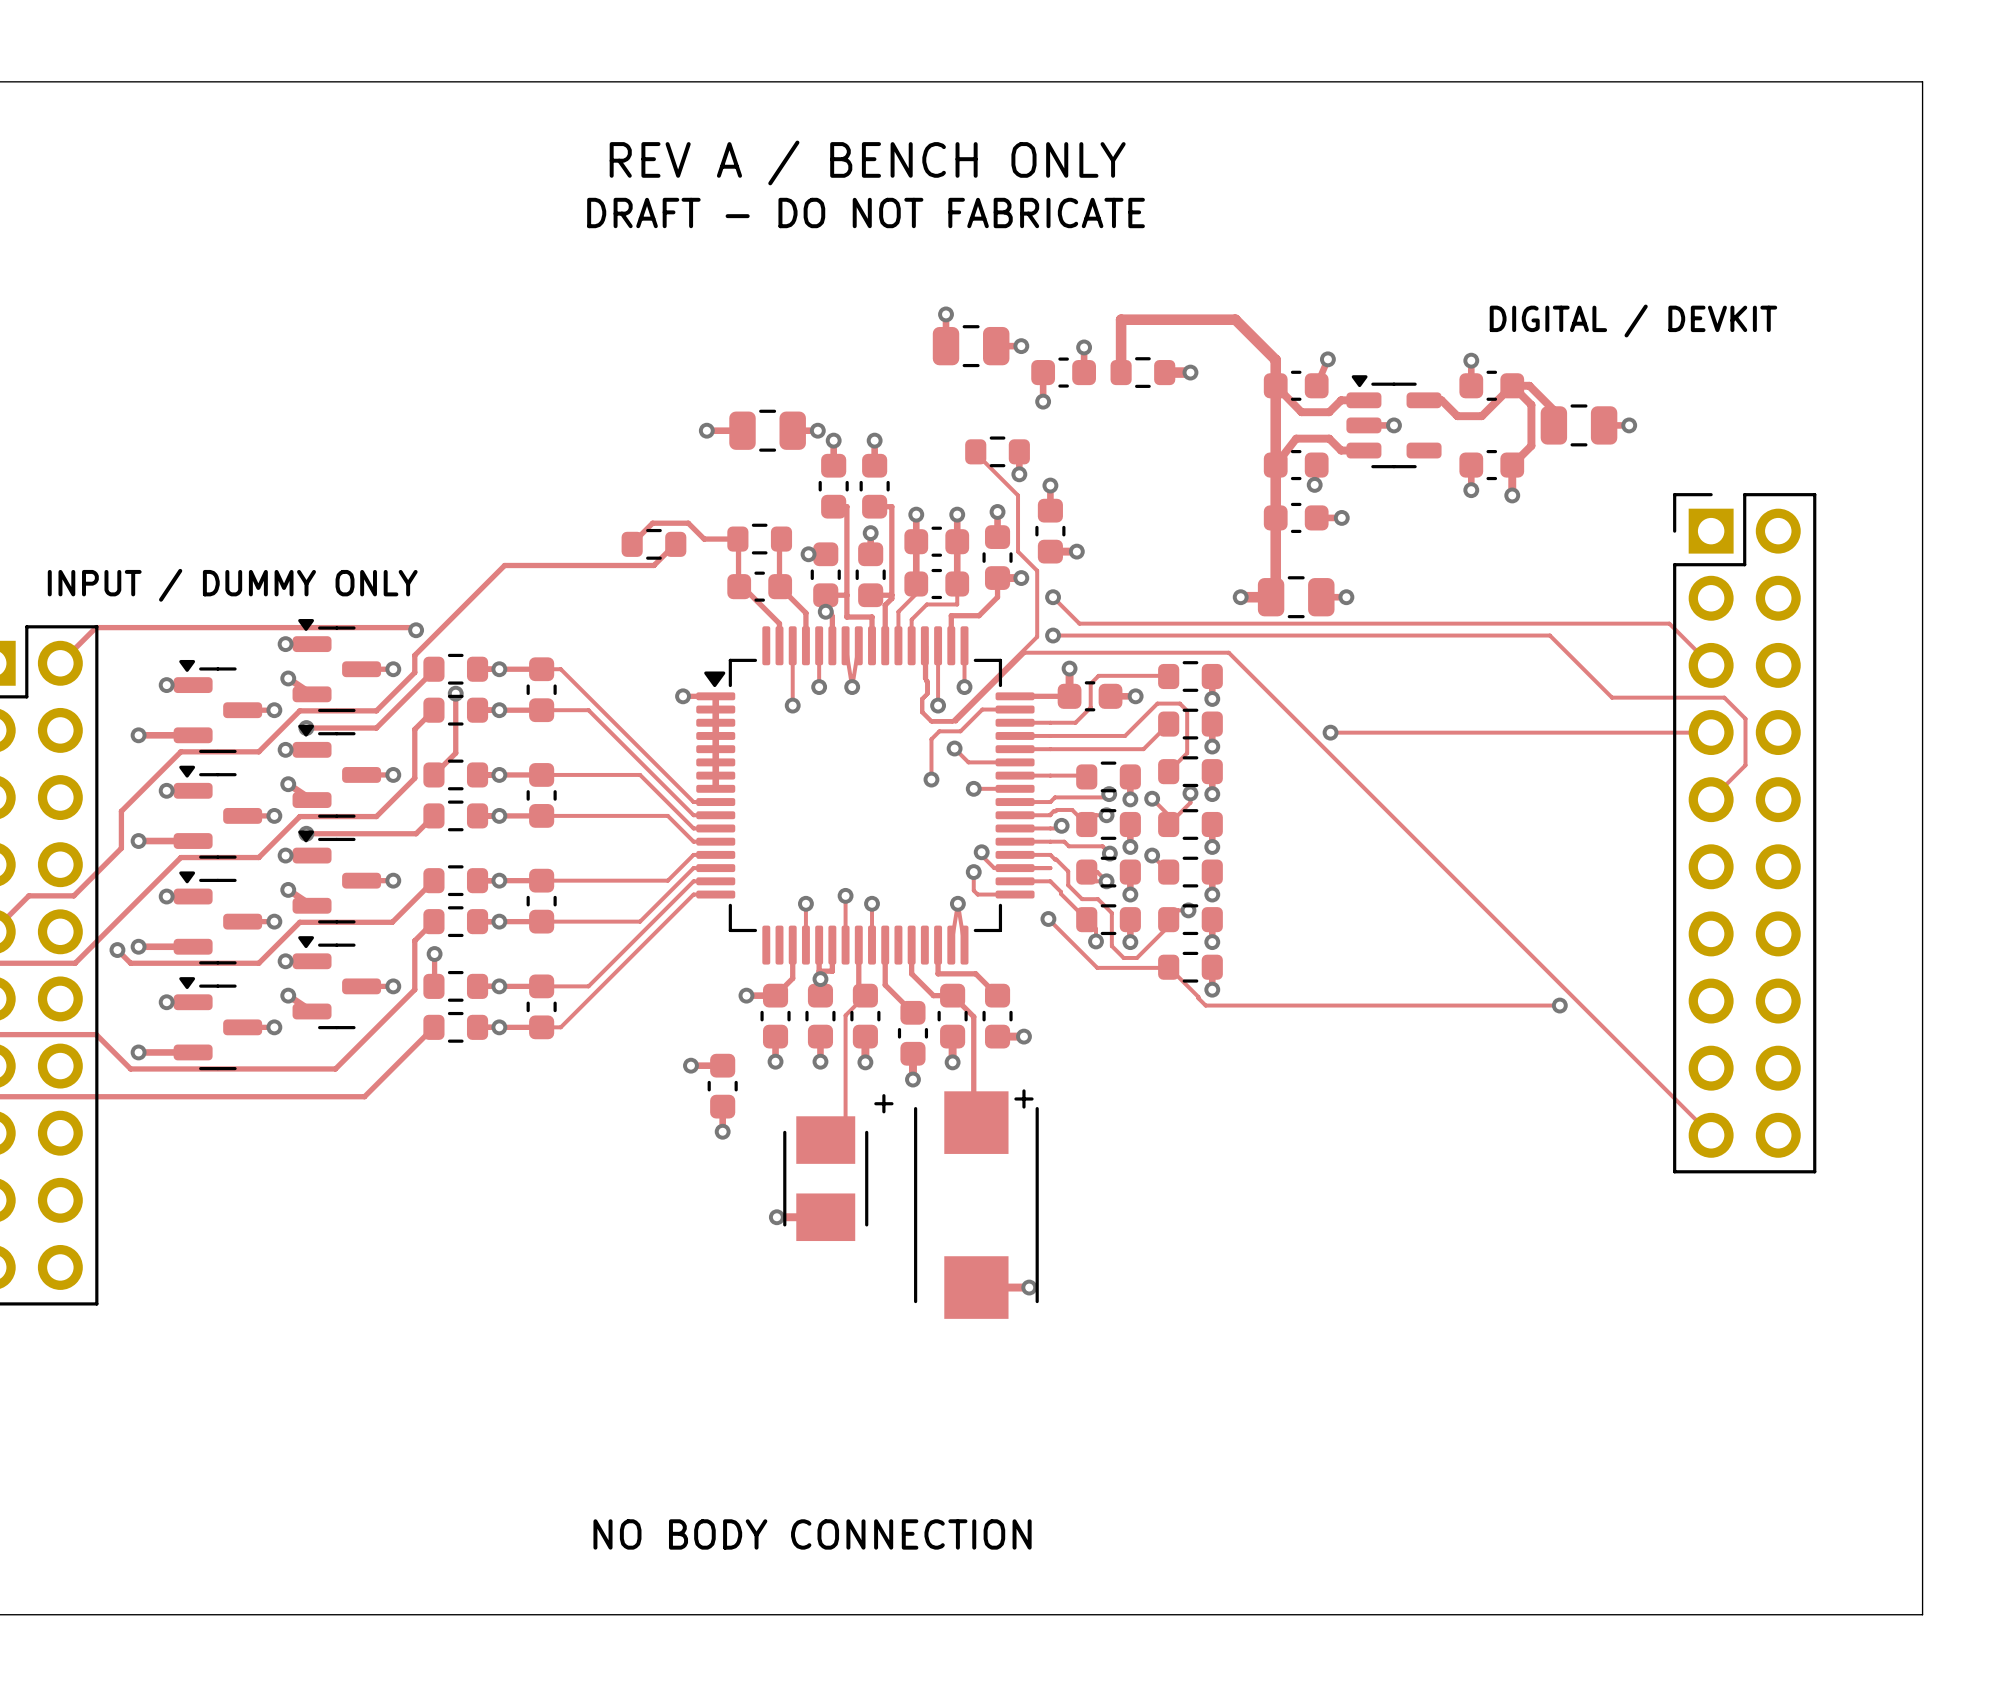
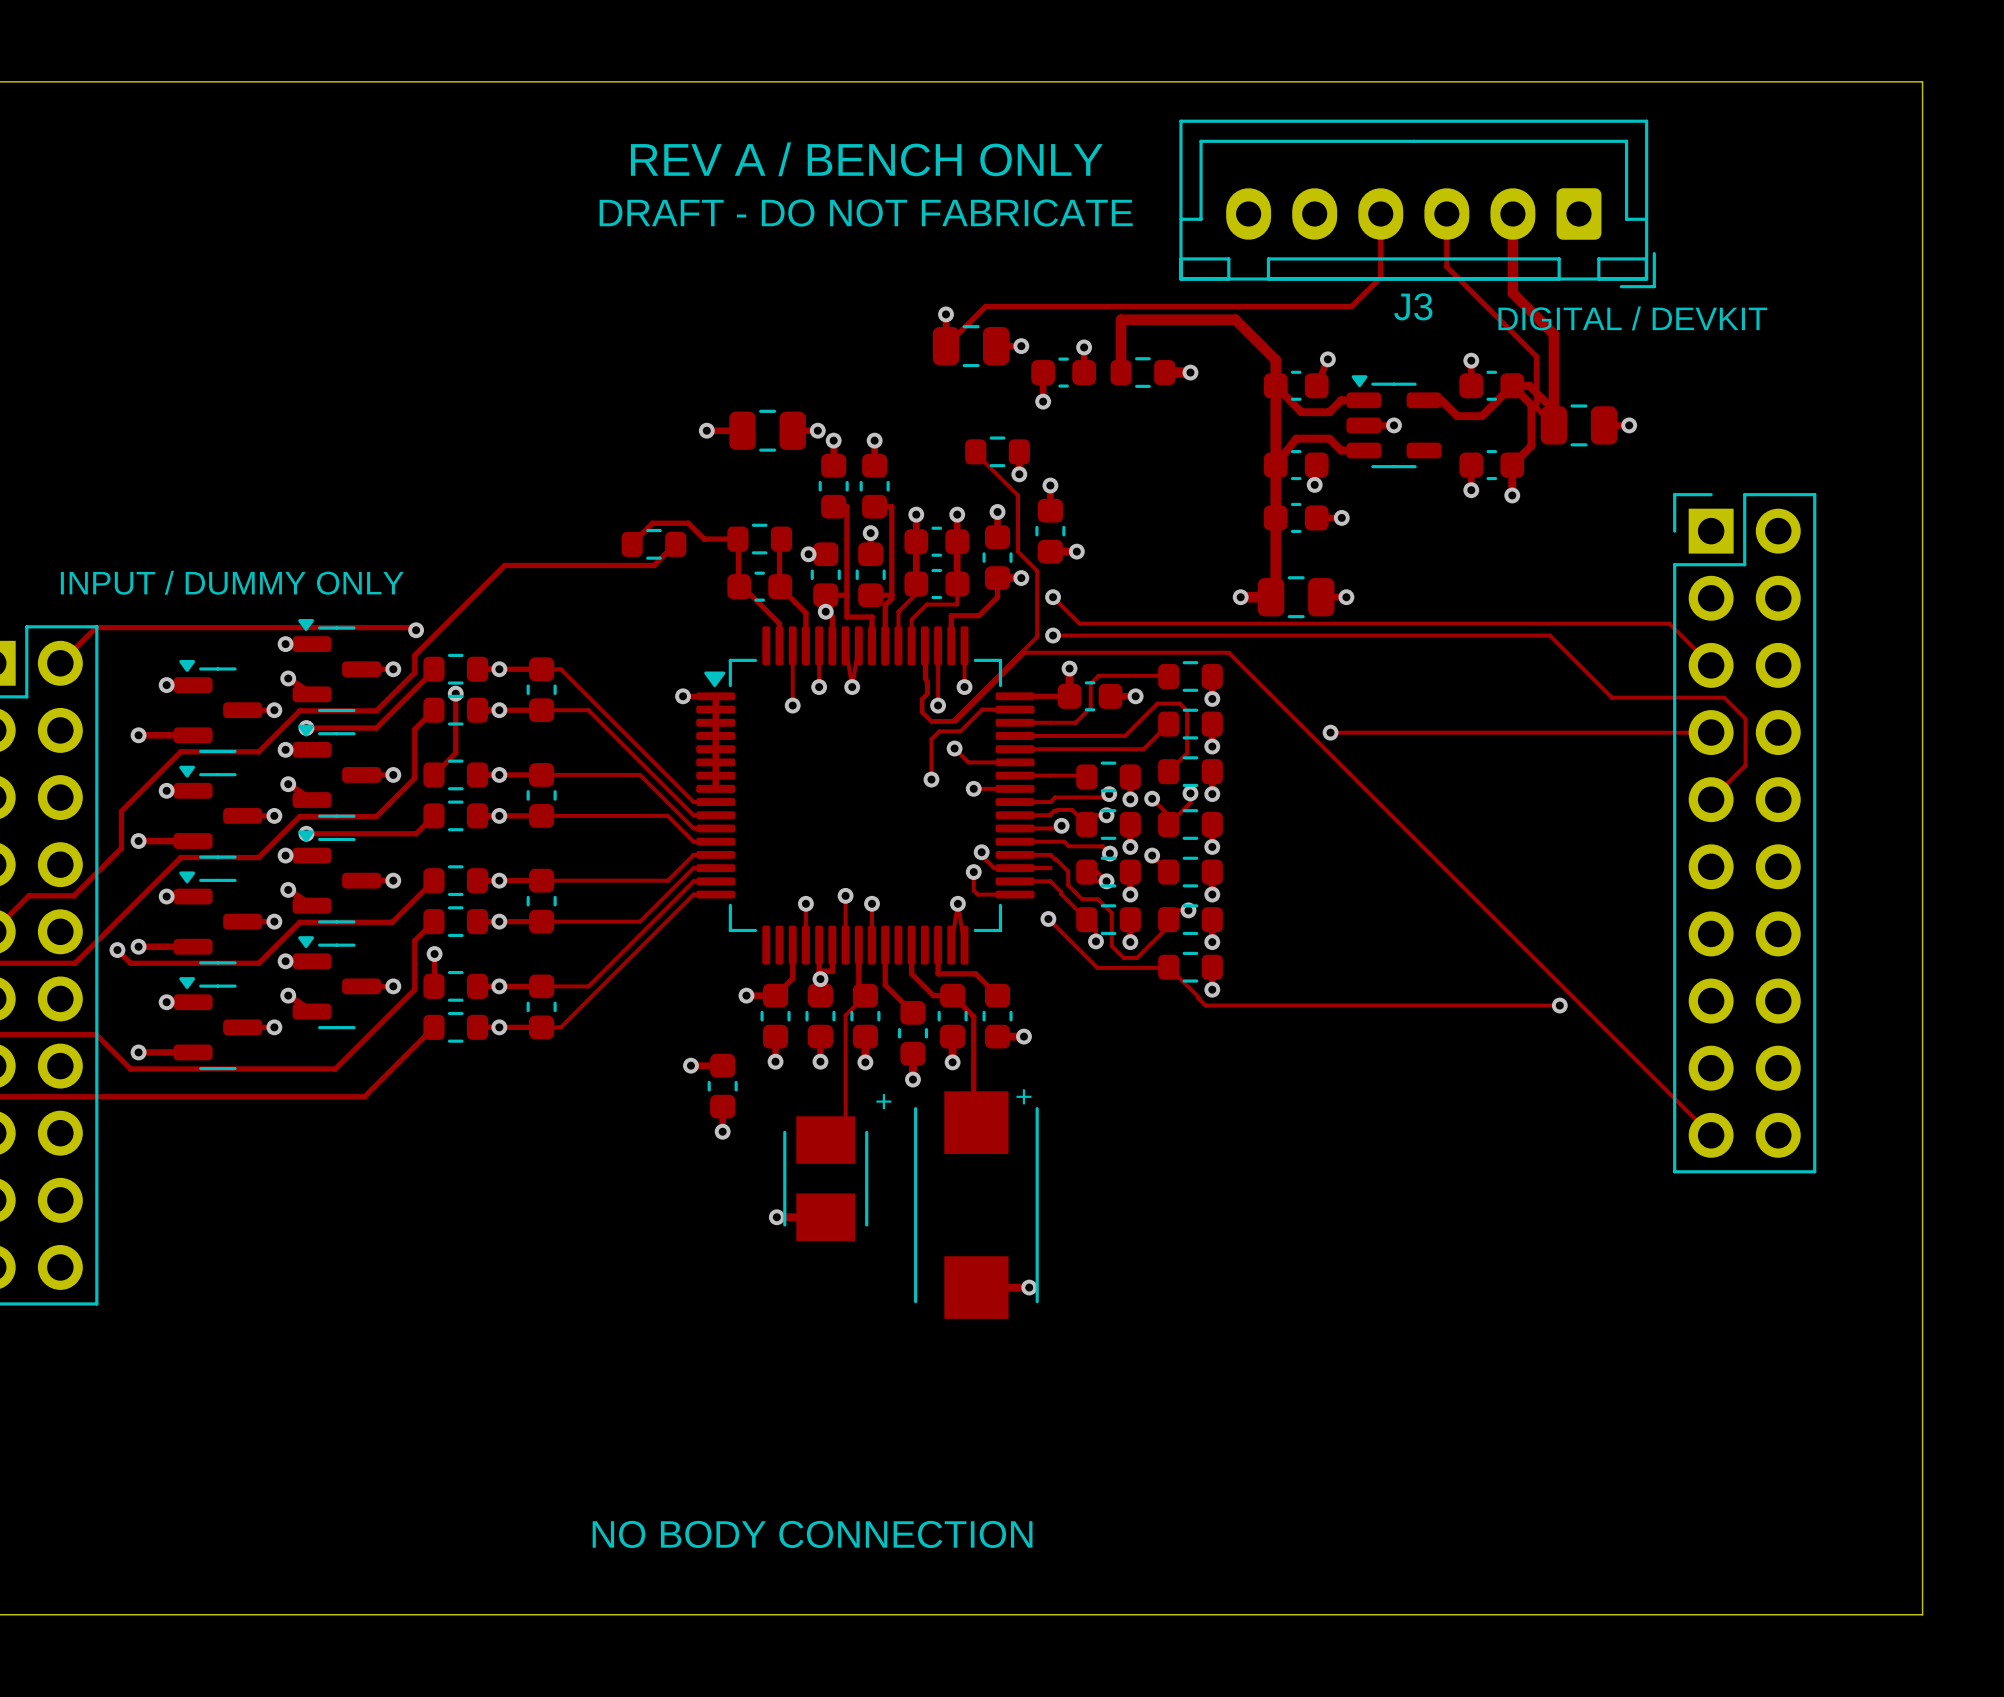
J3: none -> (1417, 203)
track: none -> (1380, 213) (1380, 277) (1351, 306) (985, 306) (946, 346)
track: none -> (1446, 213) (1446, 266) (1536, 356) (1536, 408) (1553, 425) (1553, 334) (1512, 293) (1512, 213)

